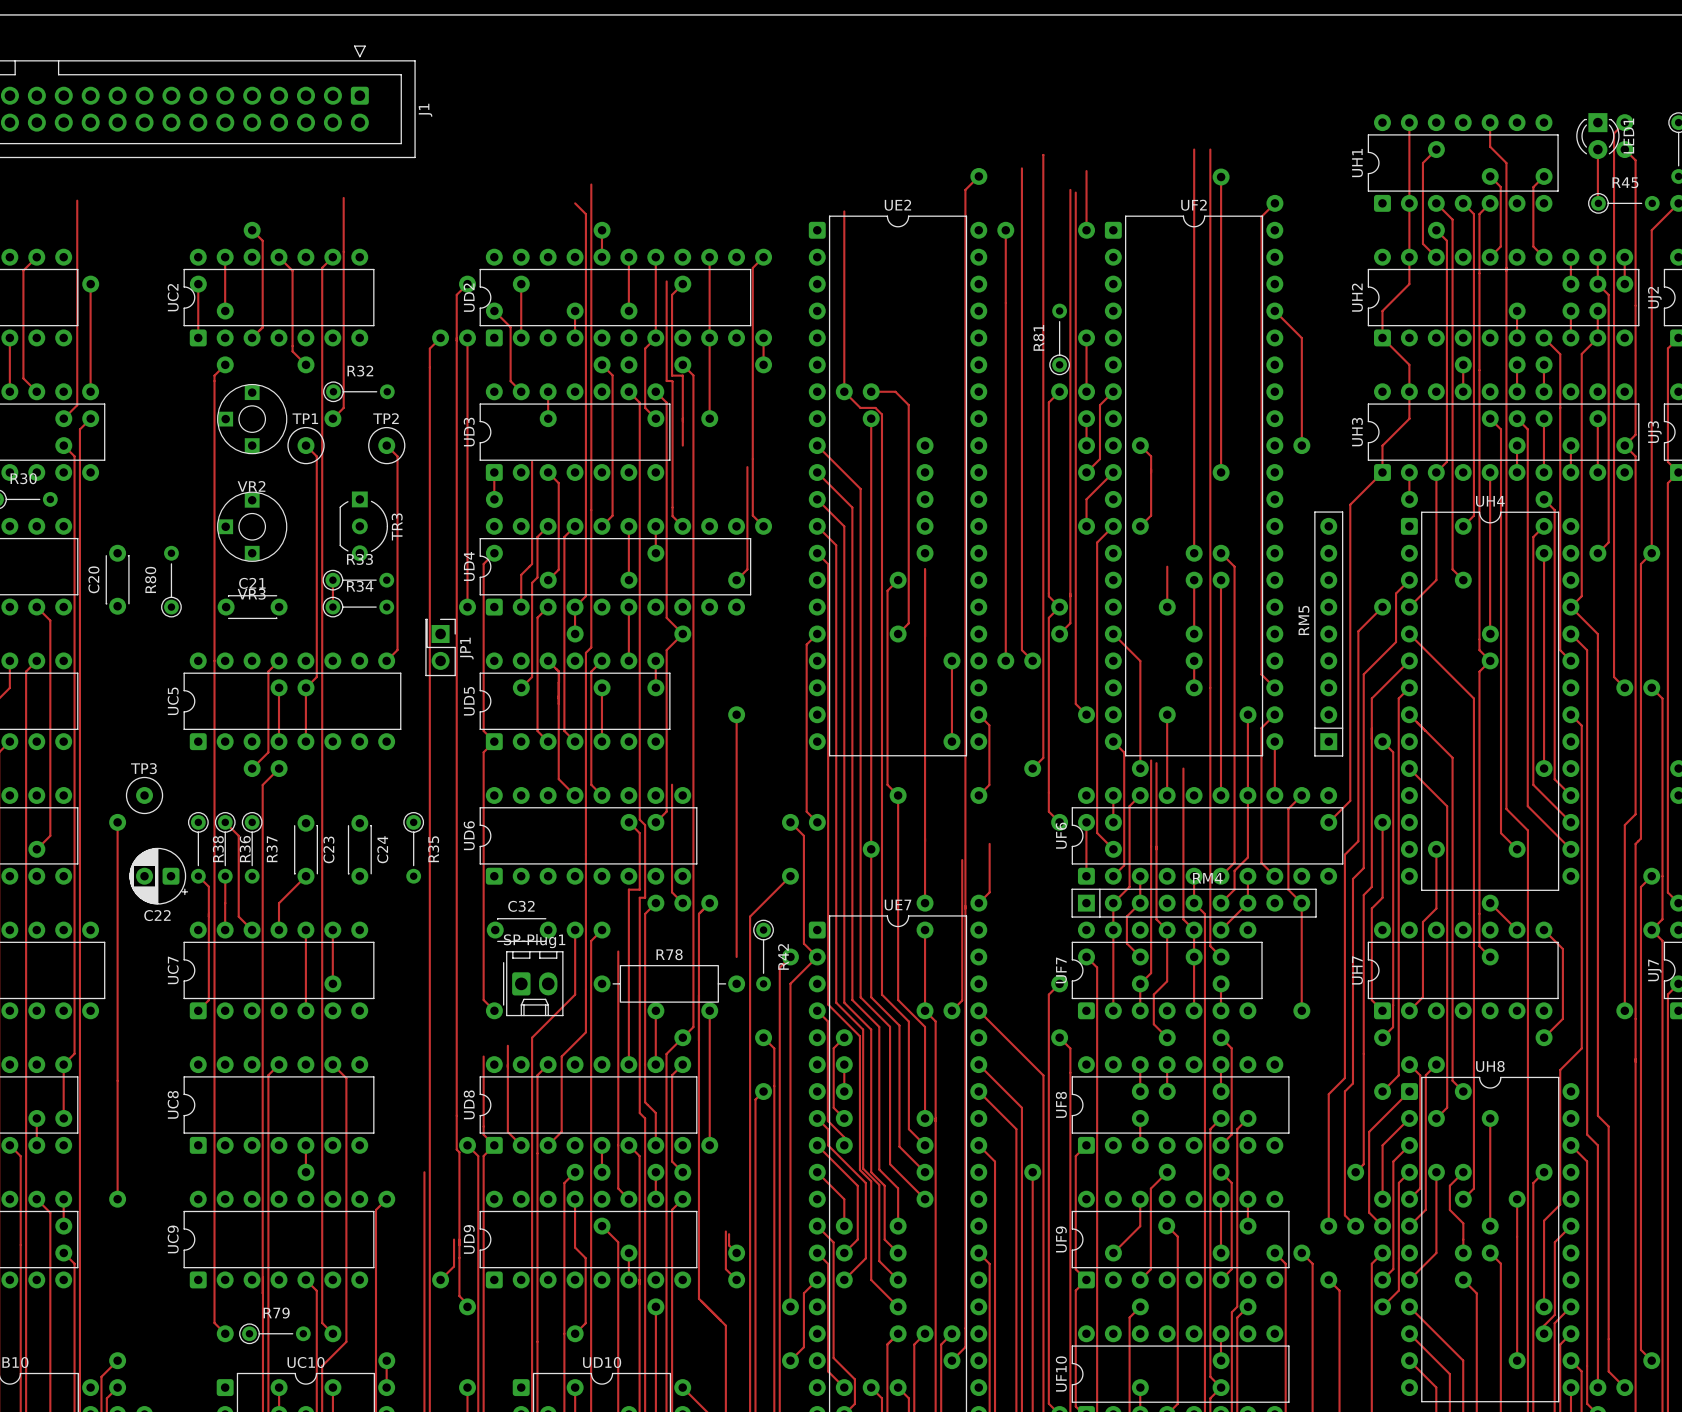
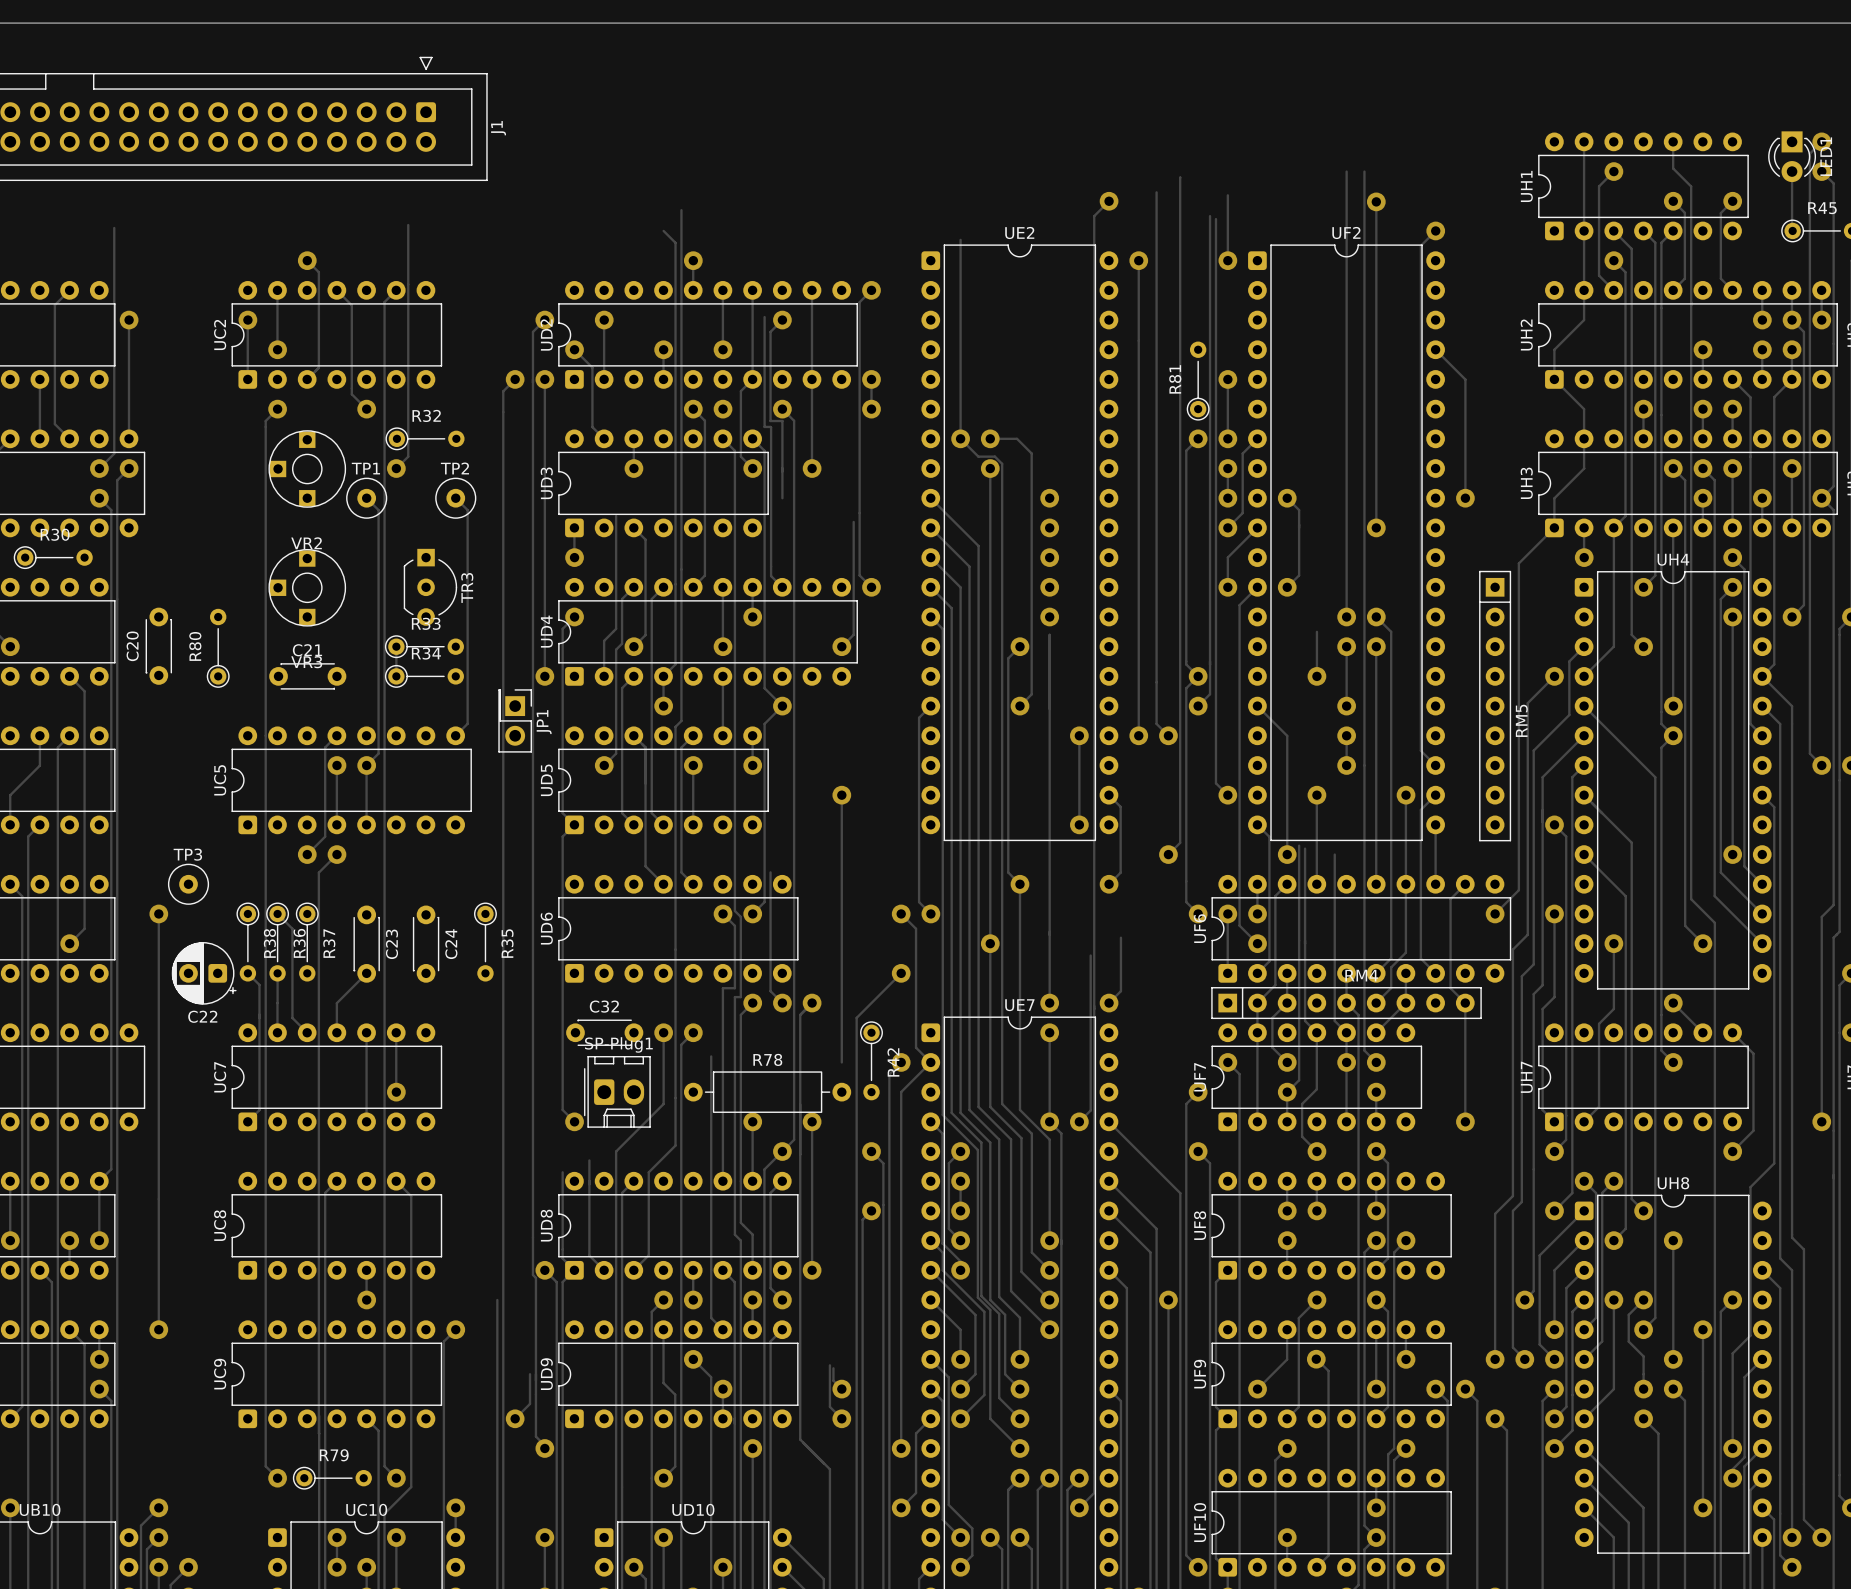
RM5 rotation: 0° (1328, 633) -> 180° (1495, 706)

